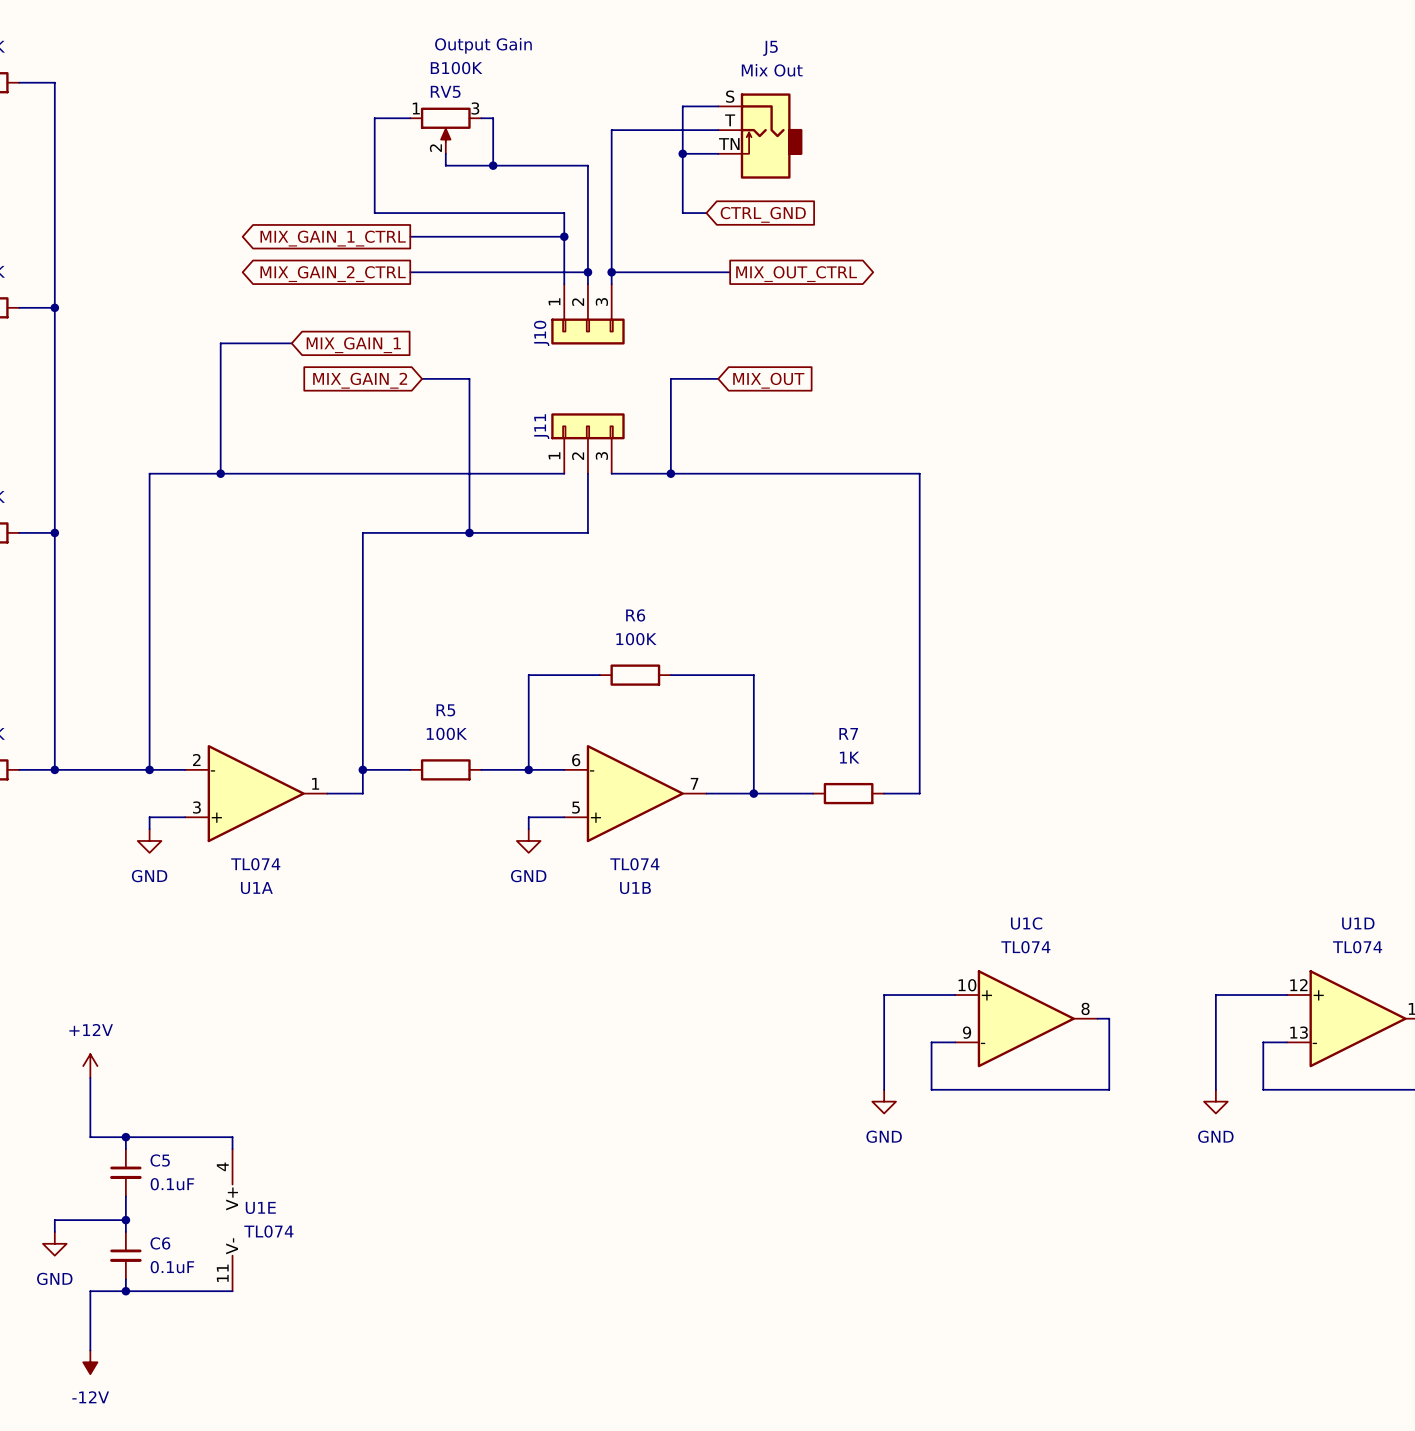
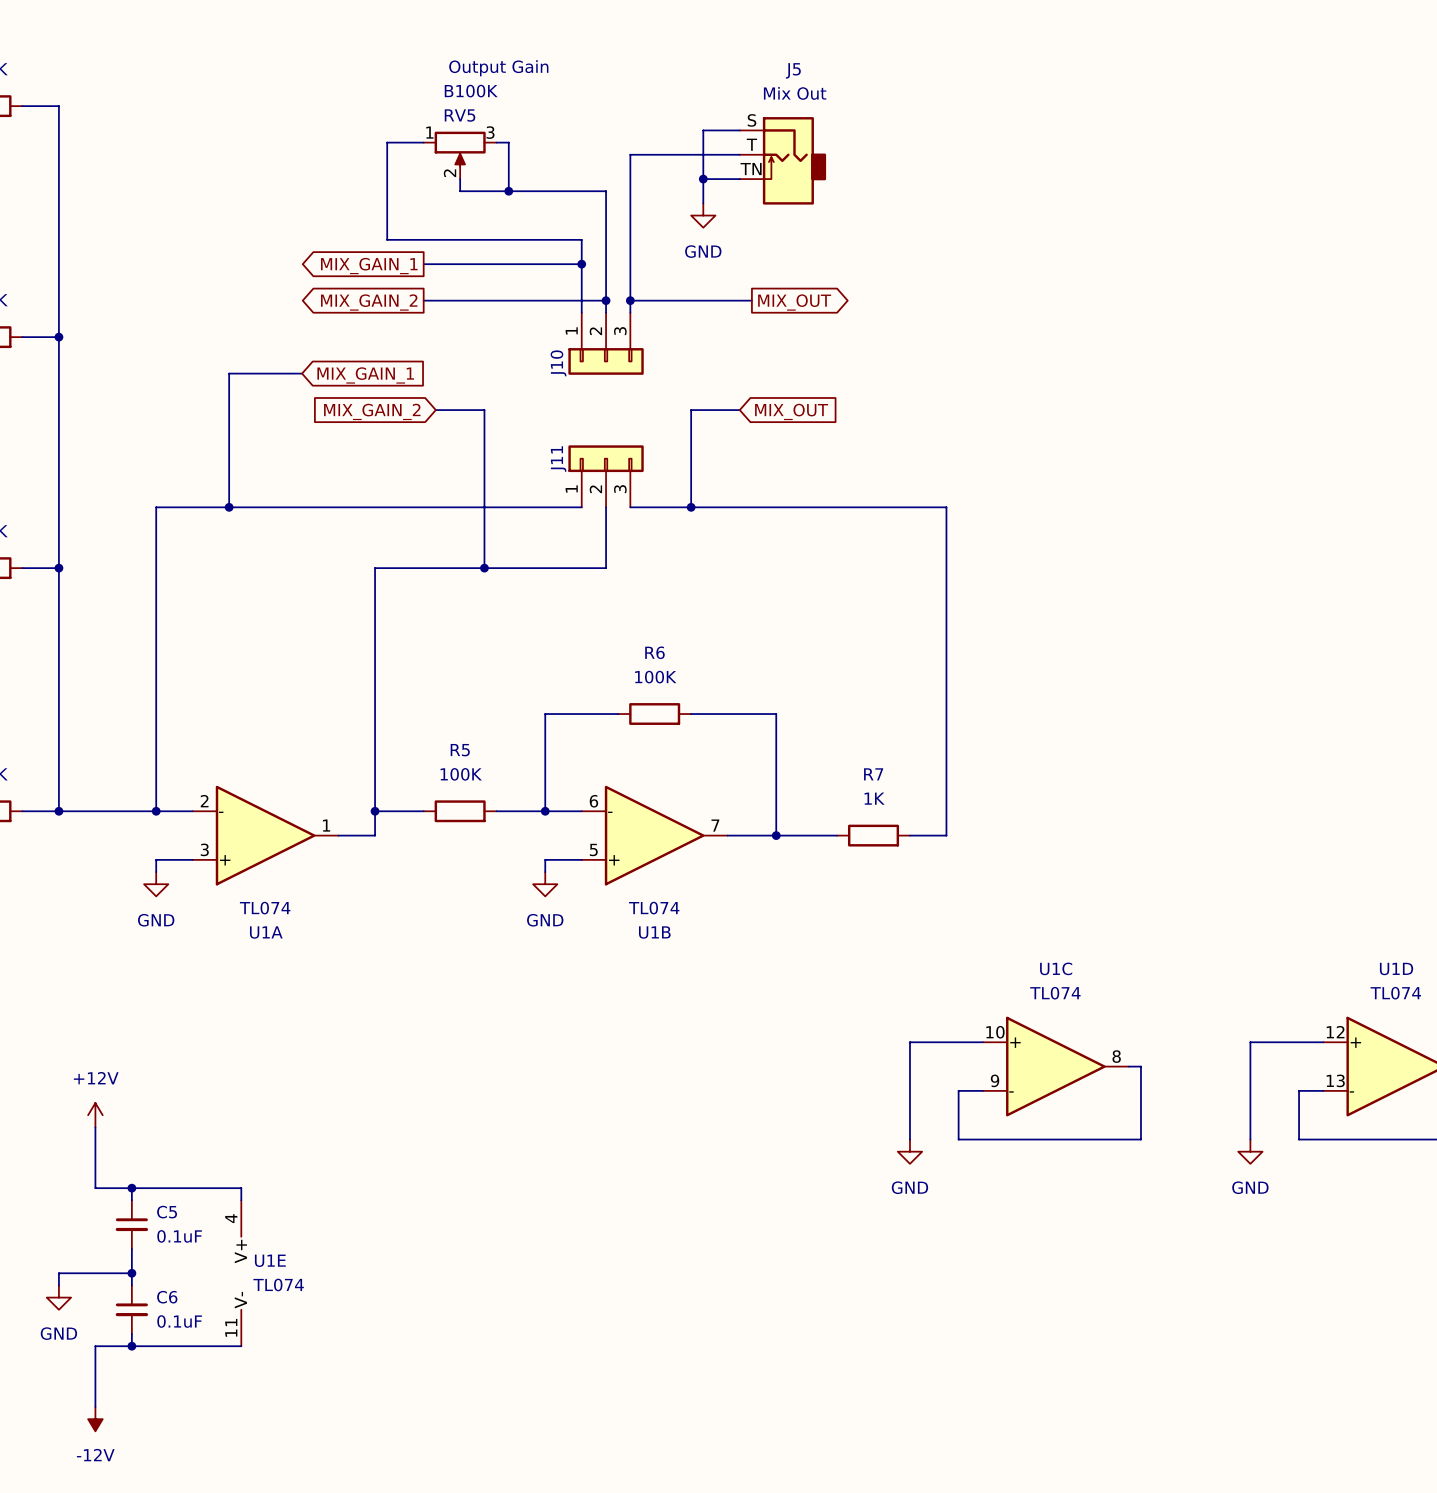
wire: (682, 177) (682, 213) (706, 213) -> none
power symbol: none -> GND (703, 215)
global label: CTRL_GND (763, 214) -> none
global label: MIX_GAIN_1_CTRL (333, 238) -> MIX_GAIN_1 (369, 266)
global label: MIX_GAIN_2_CTRL (333, 274) -> MIX_GAIN_2 (369, 302)
global label: MIX_OUT_CTRL (796, 274) -> MIX_OUT (794, 302)

